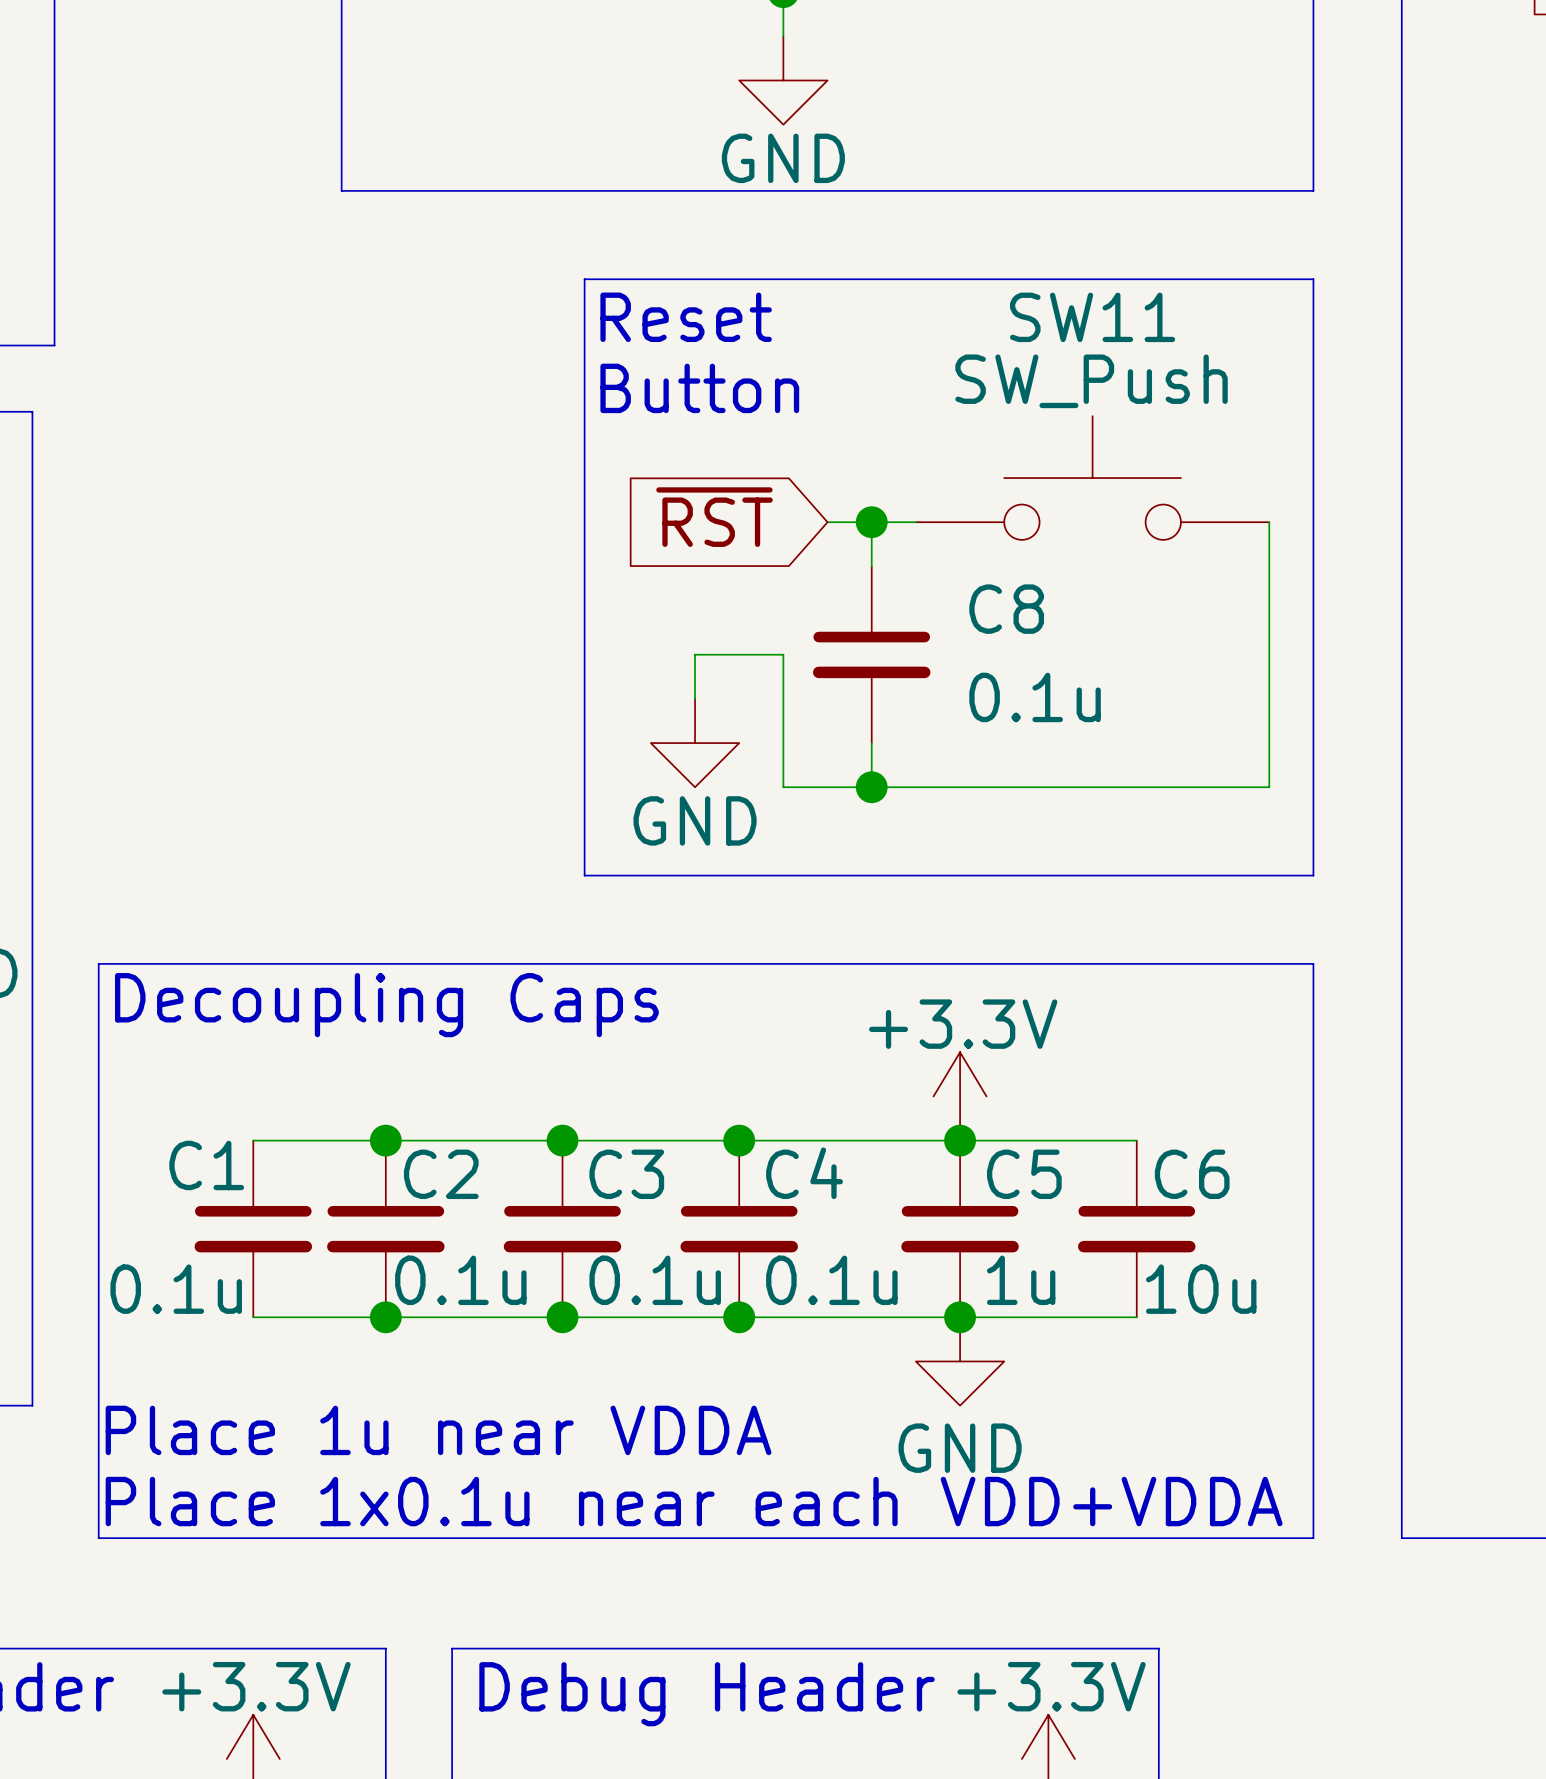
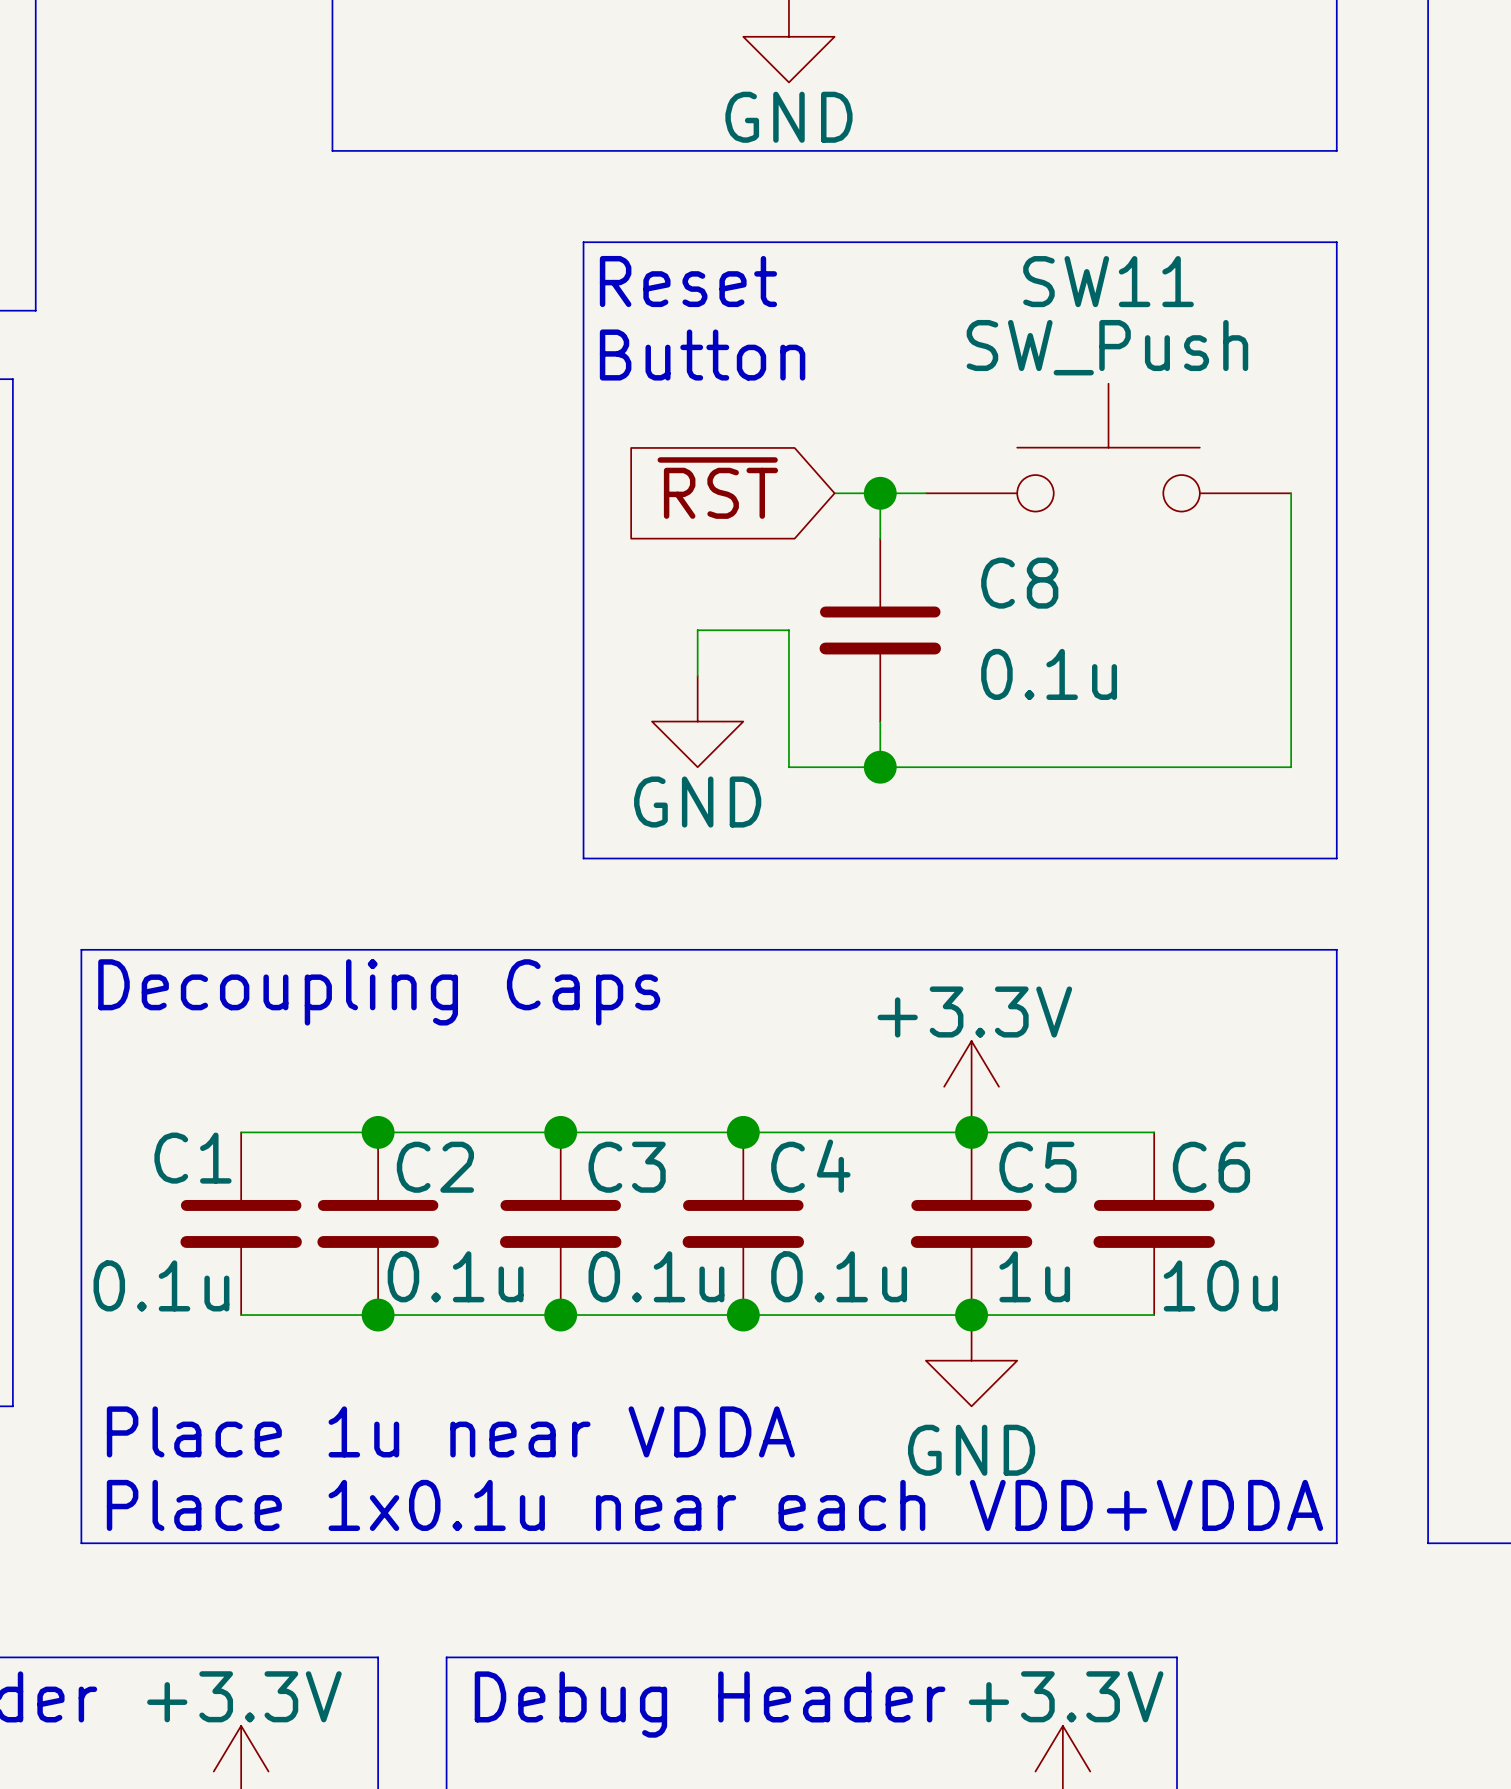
text position: Place 1u near VDDA (438, 1430) -> Place 1u near VDDA (450, 1431)
text position: Place 1x0.1u near each VDD+VDDA (694, 1501) -> Place 1x0.1u near each VDD+VDDA (714, 1505)

